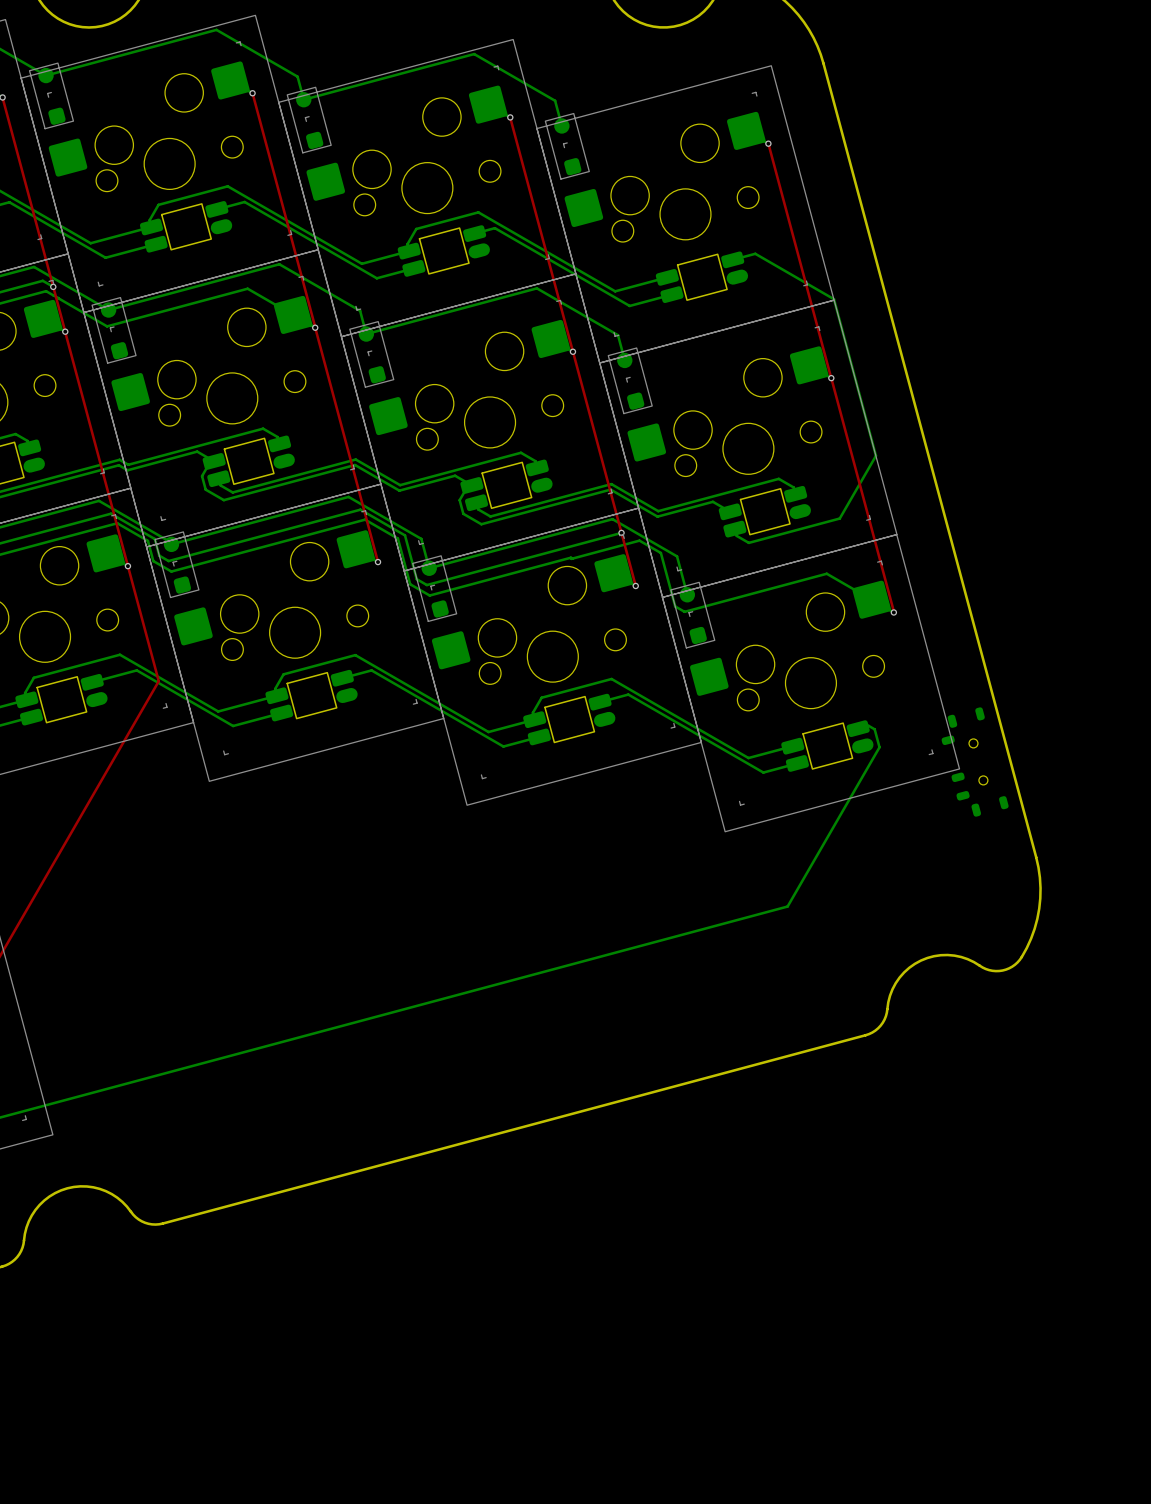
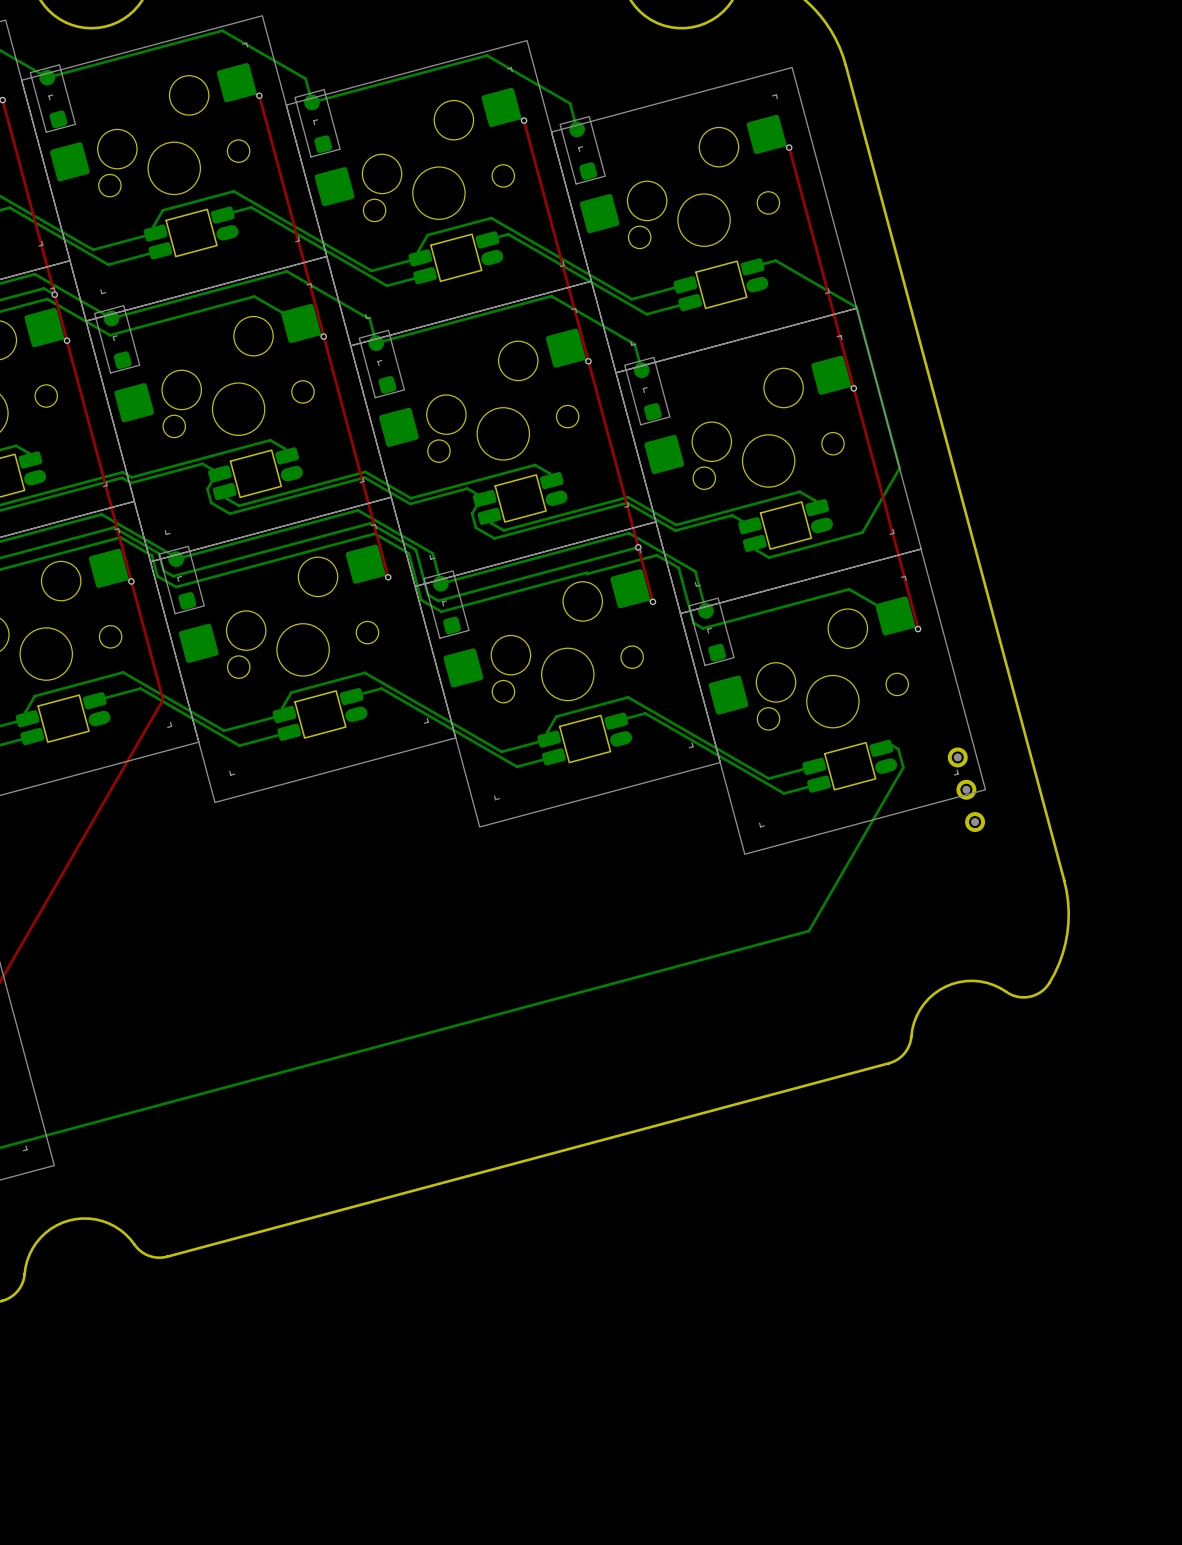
part: (975, 762) -> none
part: none -> (966, 789)

